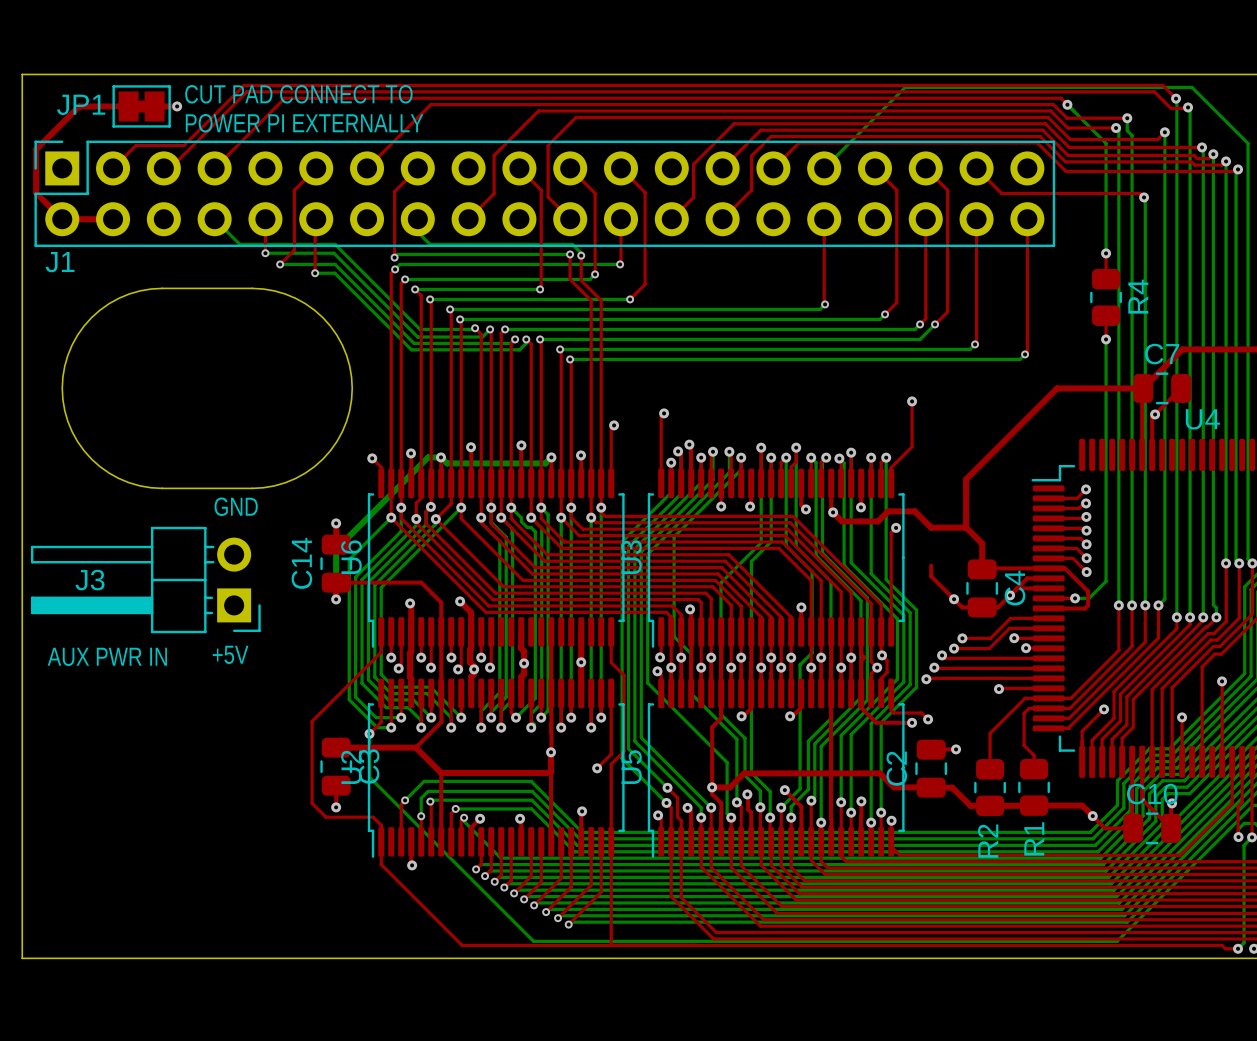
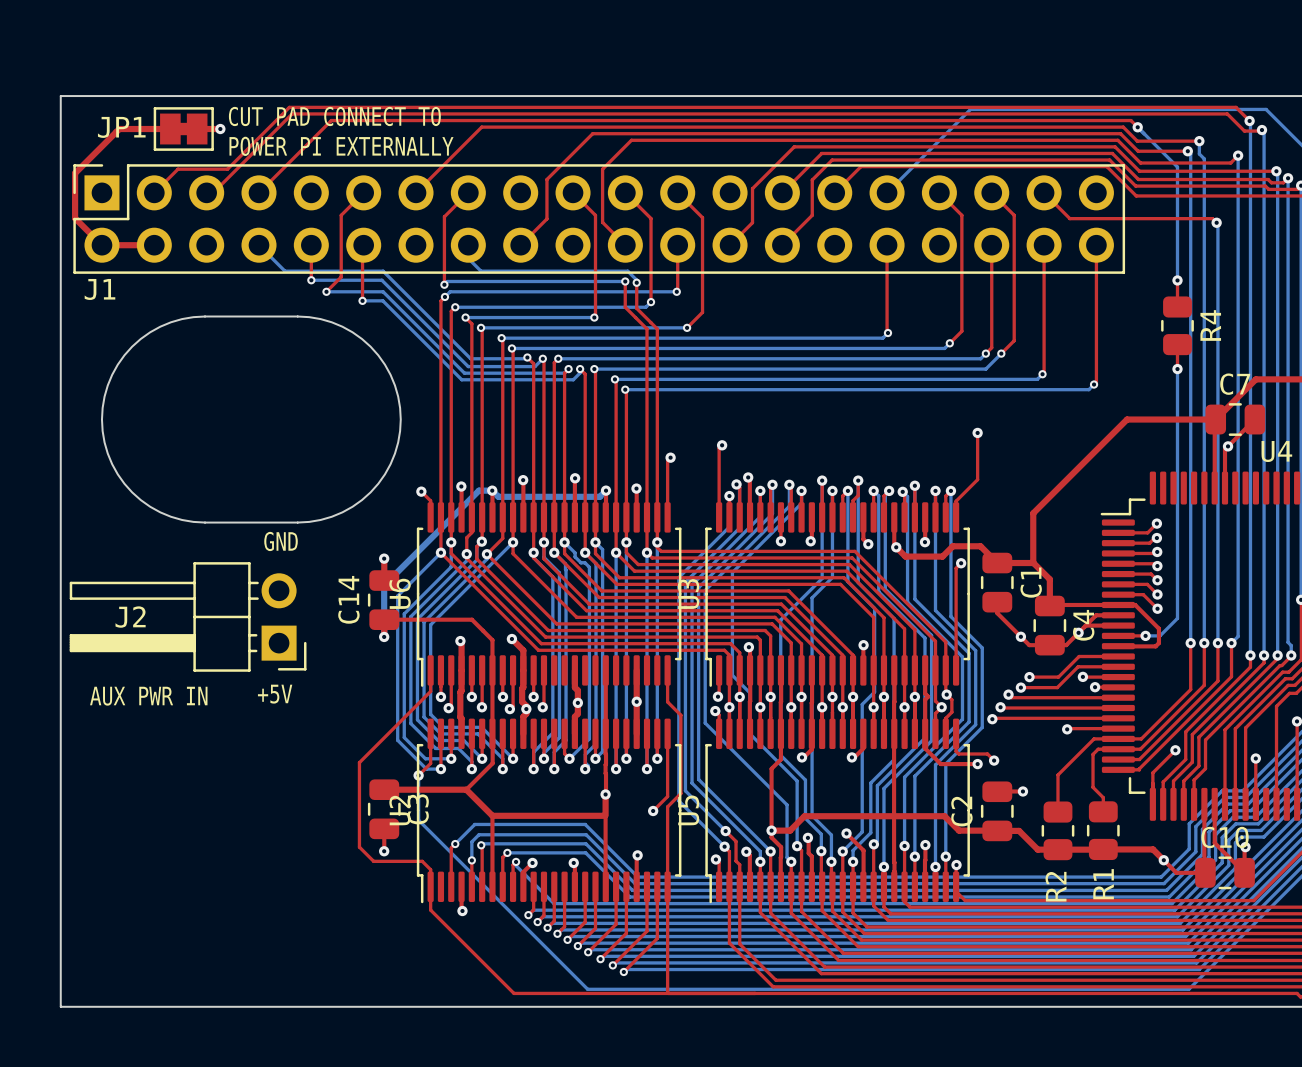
C1: none -> (997, 582)
J3 name: J3 (90, 580) -> J2 (130, 617)

